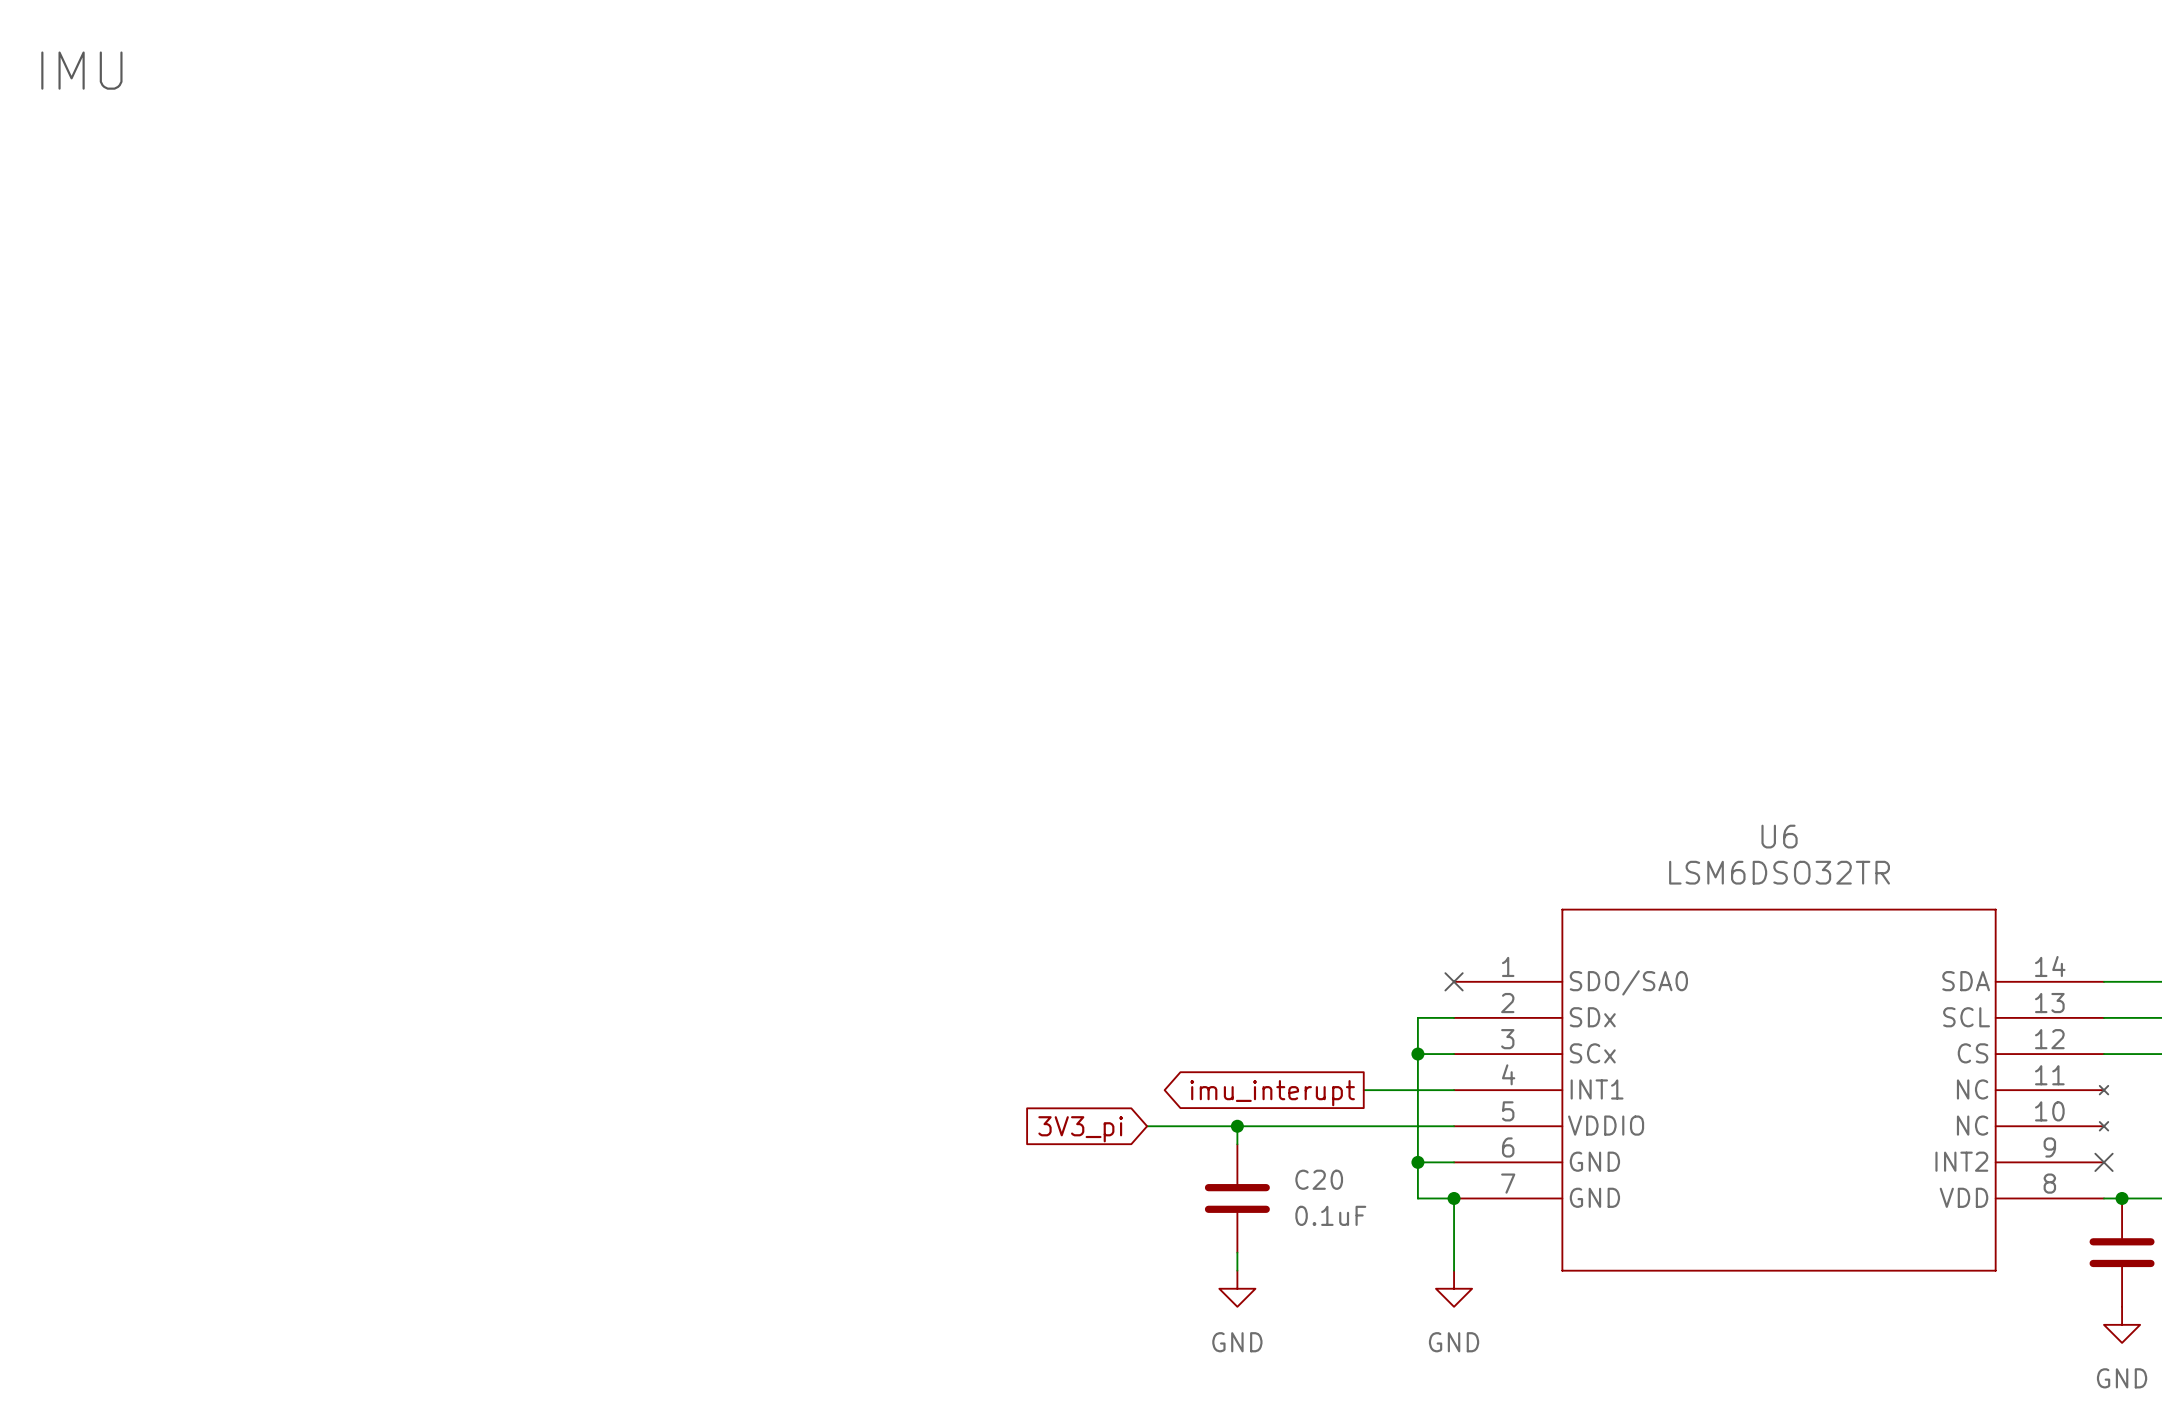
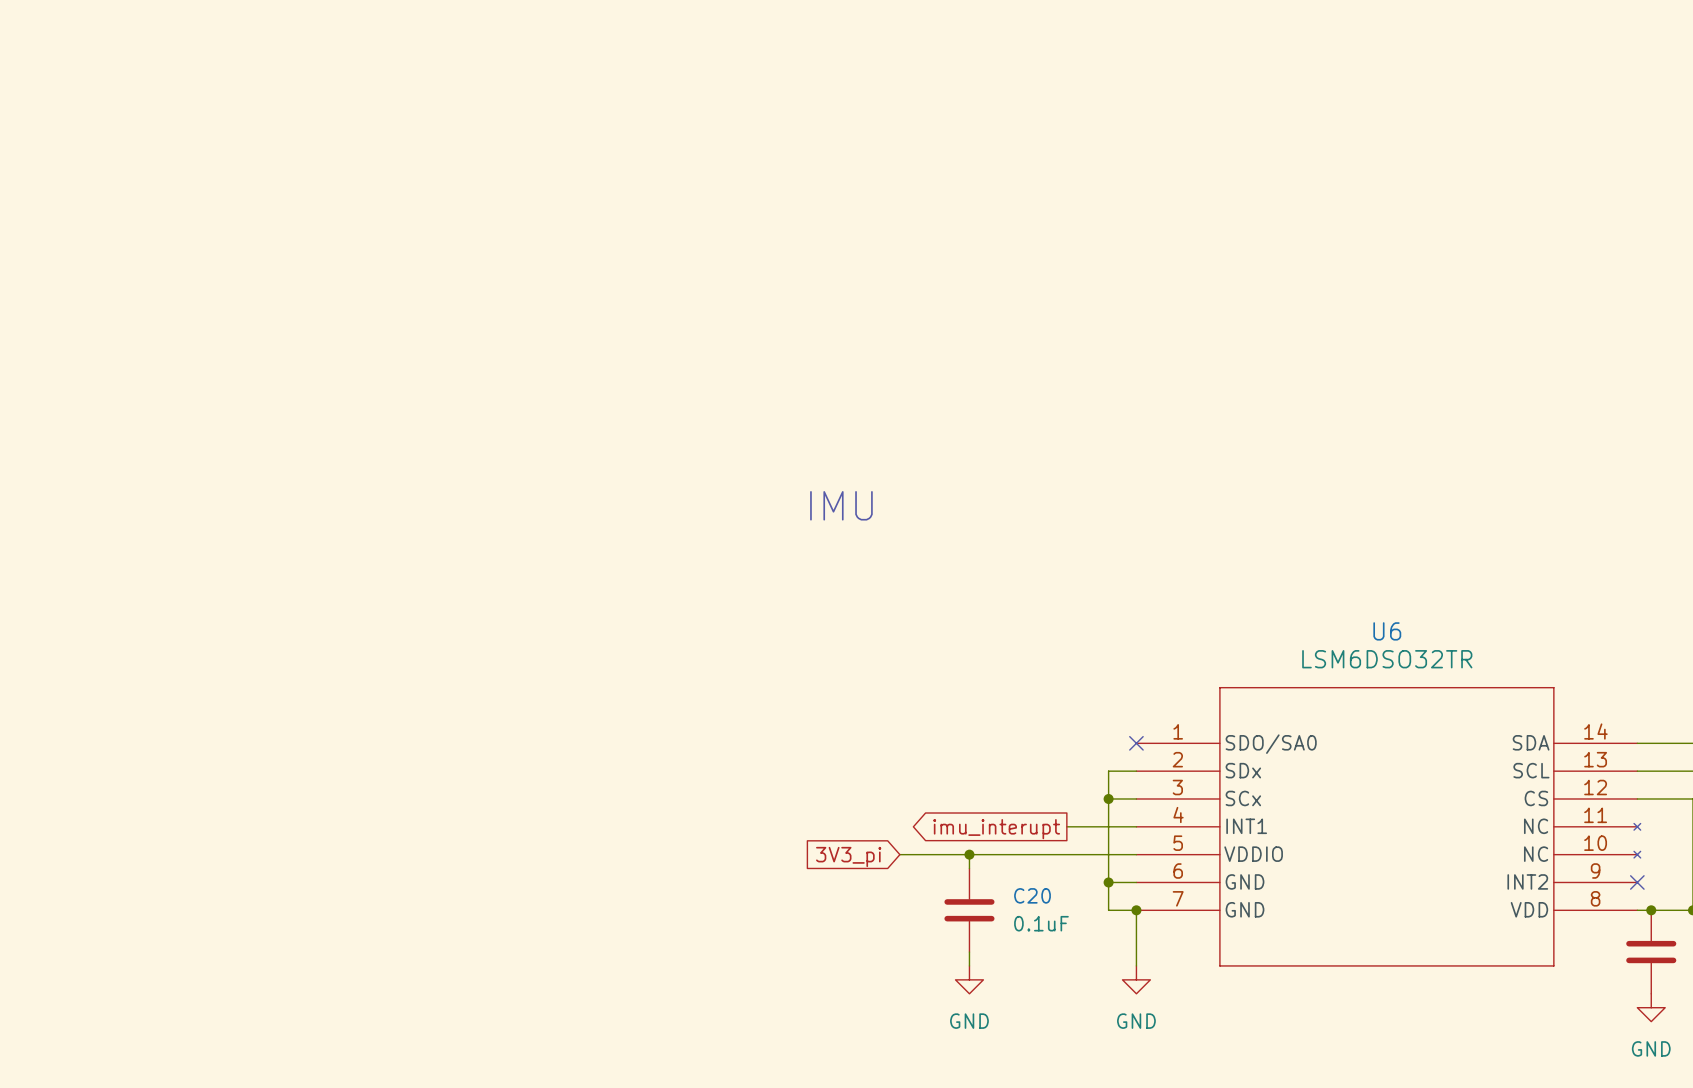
text: IMU (81, 70) -> none
text: none -> IMU (841, 505)

